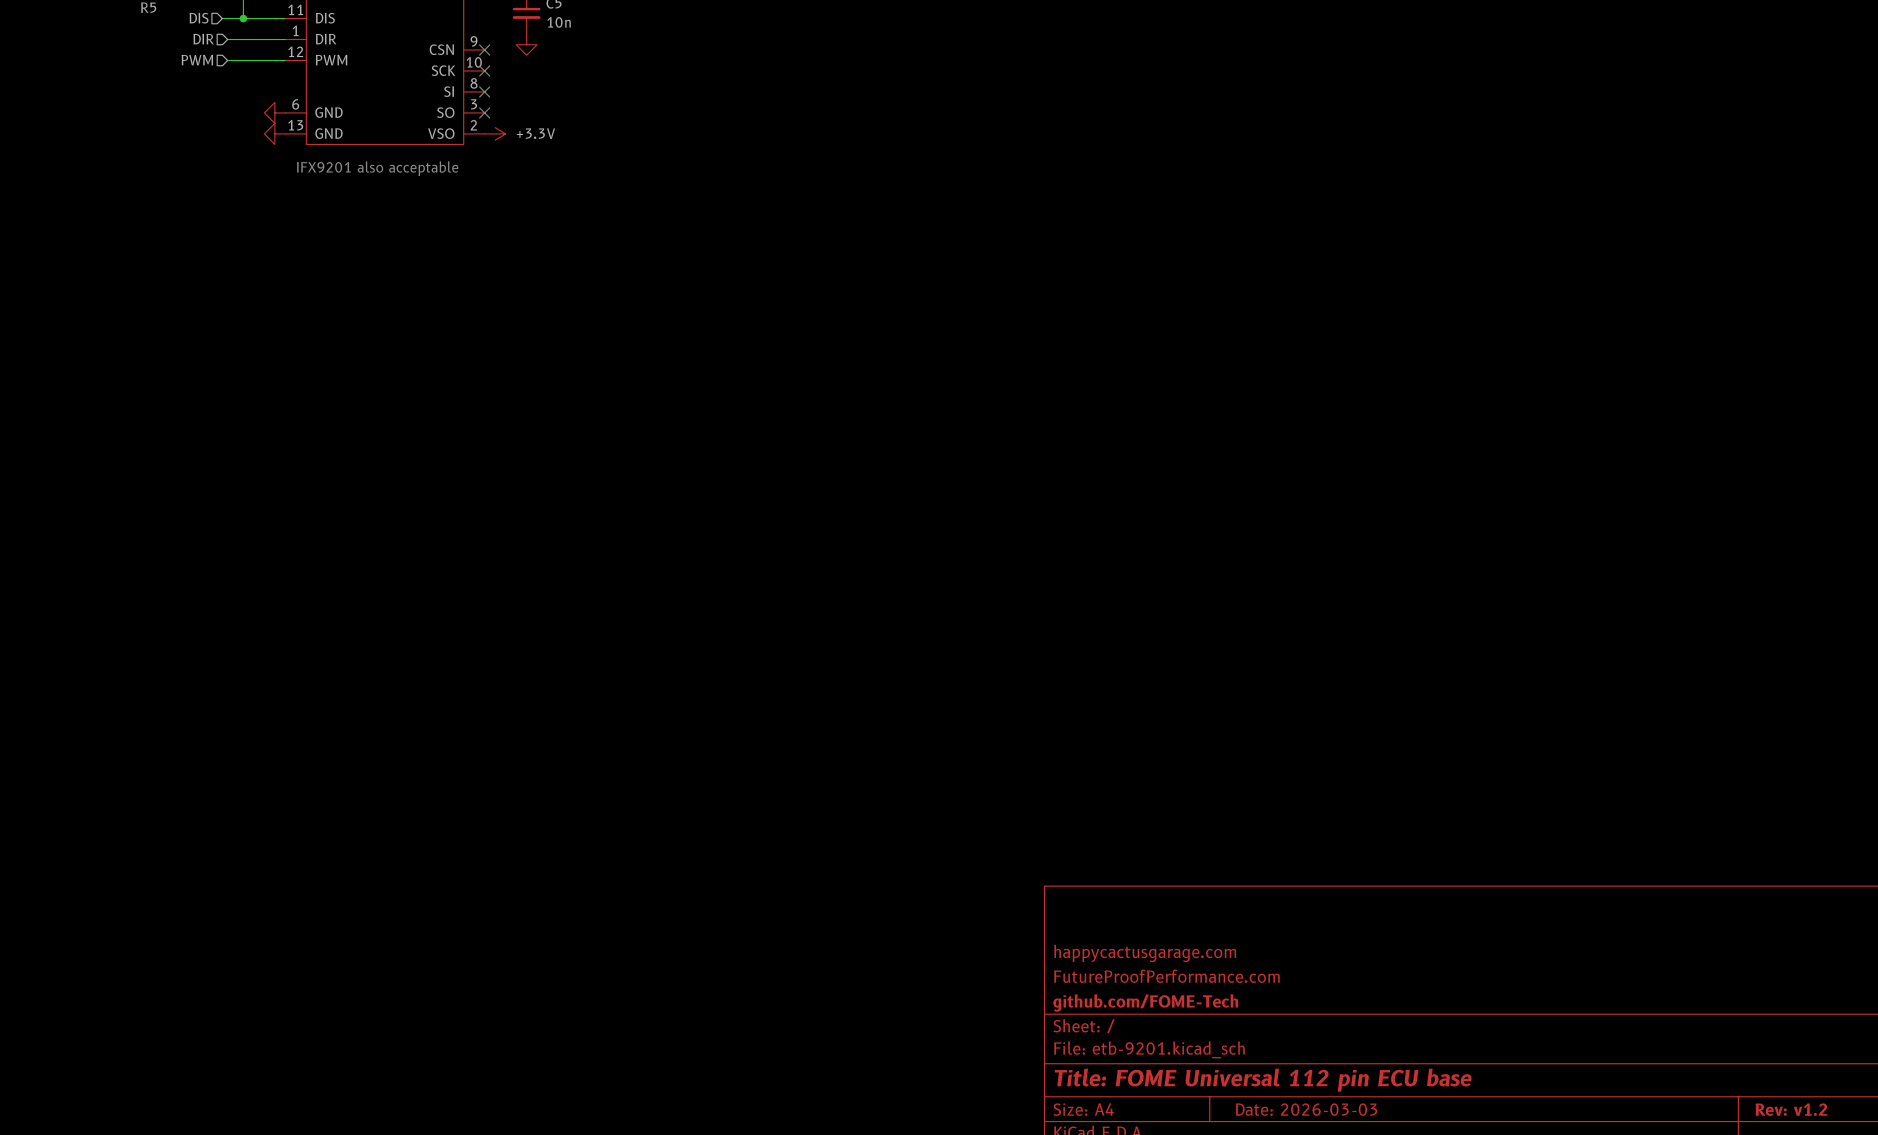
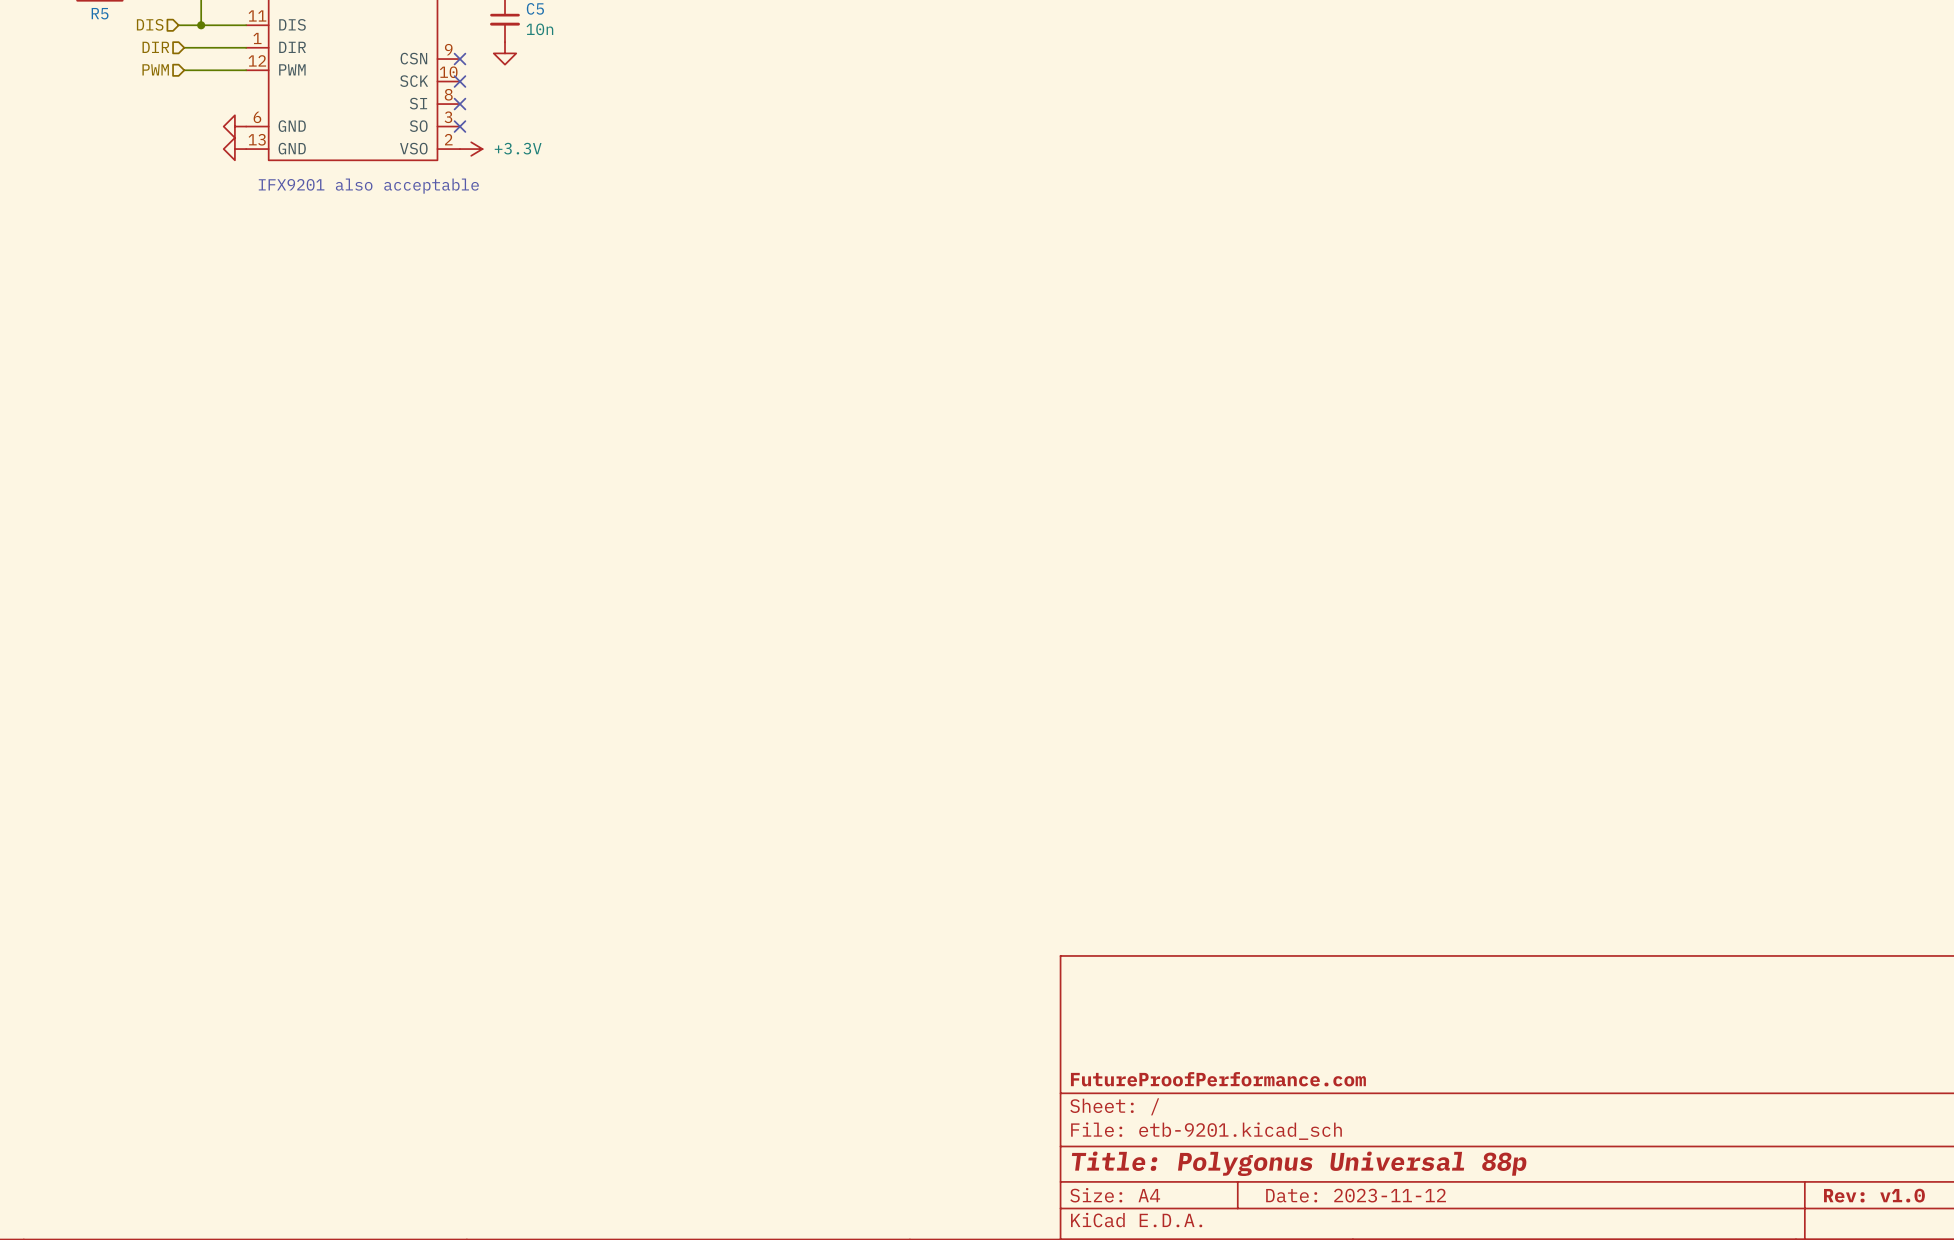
title block: happycactusgarage.com (1145, 953) -> none
title block: FutureProofPerformance.com (1166, 976) -> none
title block: github.com/FOME-Tech (1145, 1003) -> FutureProofPerformance.com (1218, 1079)
title block: Title: FOME Universal 112 pin ECU base (1263, 1080) -> Title: Polygonus Universal 88p (1299, 1163)
title block: Date: 2026-03-03 (1306, 1109) -> Date: 2023-11-12 (1356, 1195)
title block: Rev: v1.2 (1791, 1109) -> Rev: v1.0 (1874, 1195)

